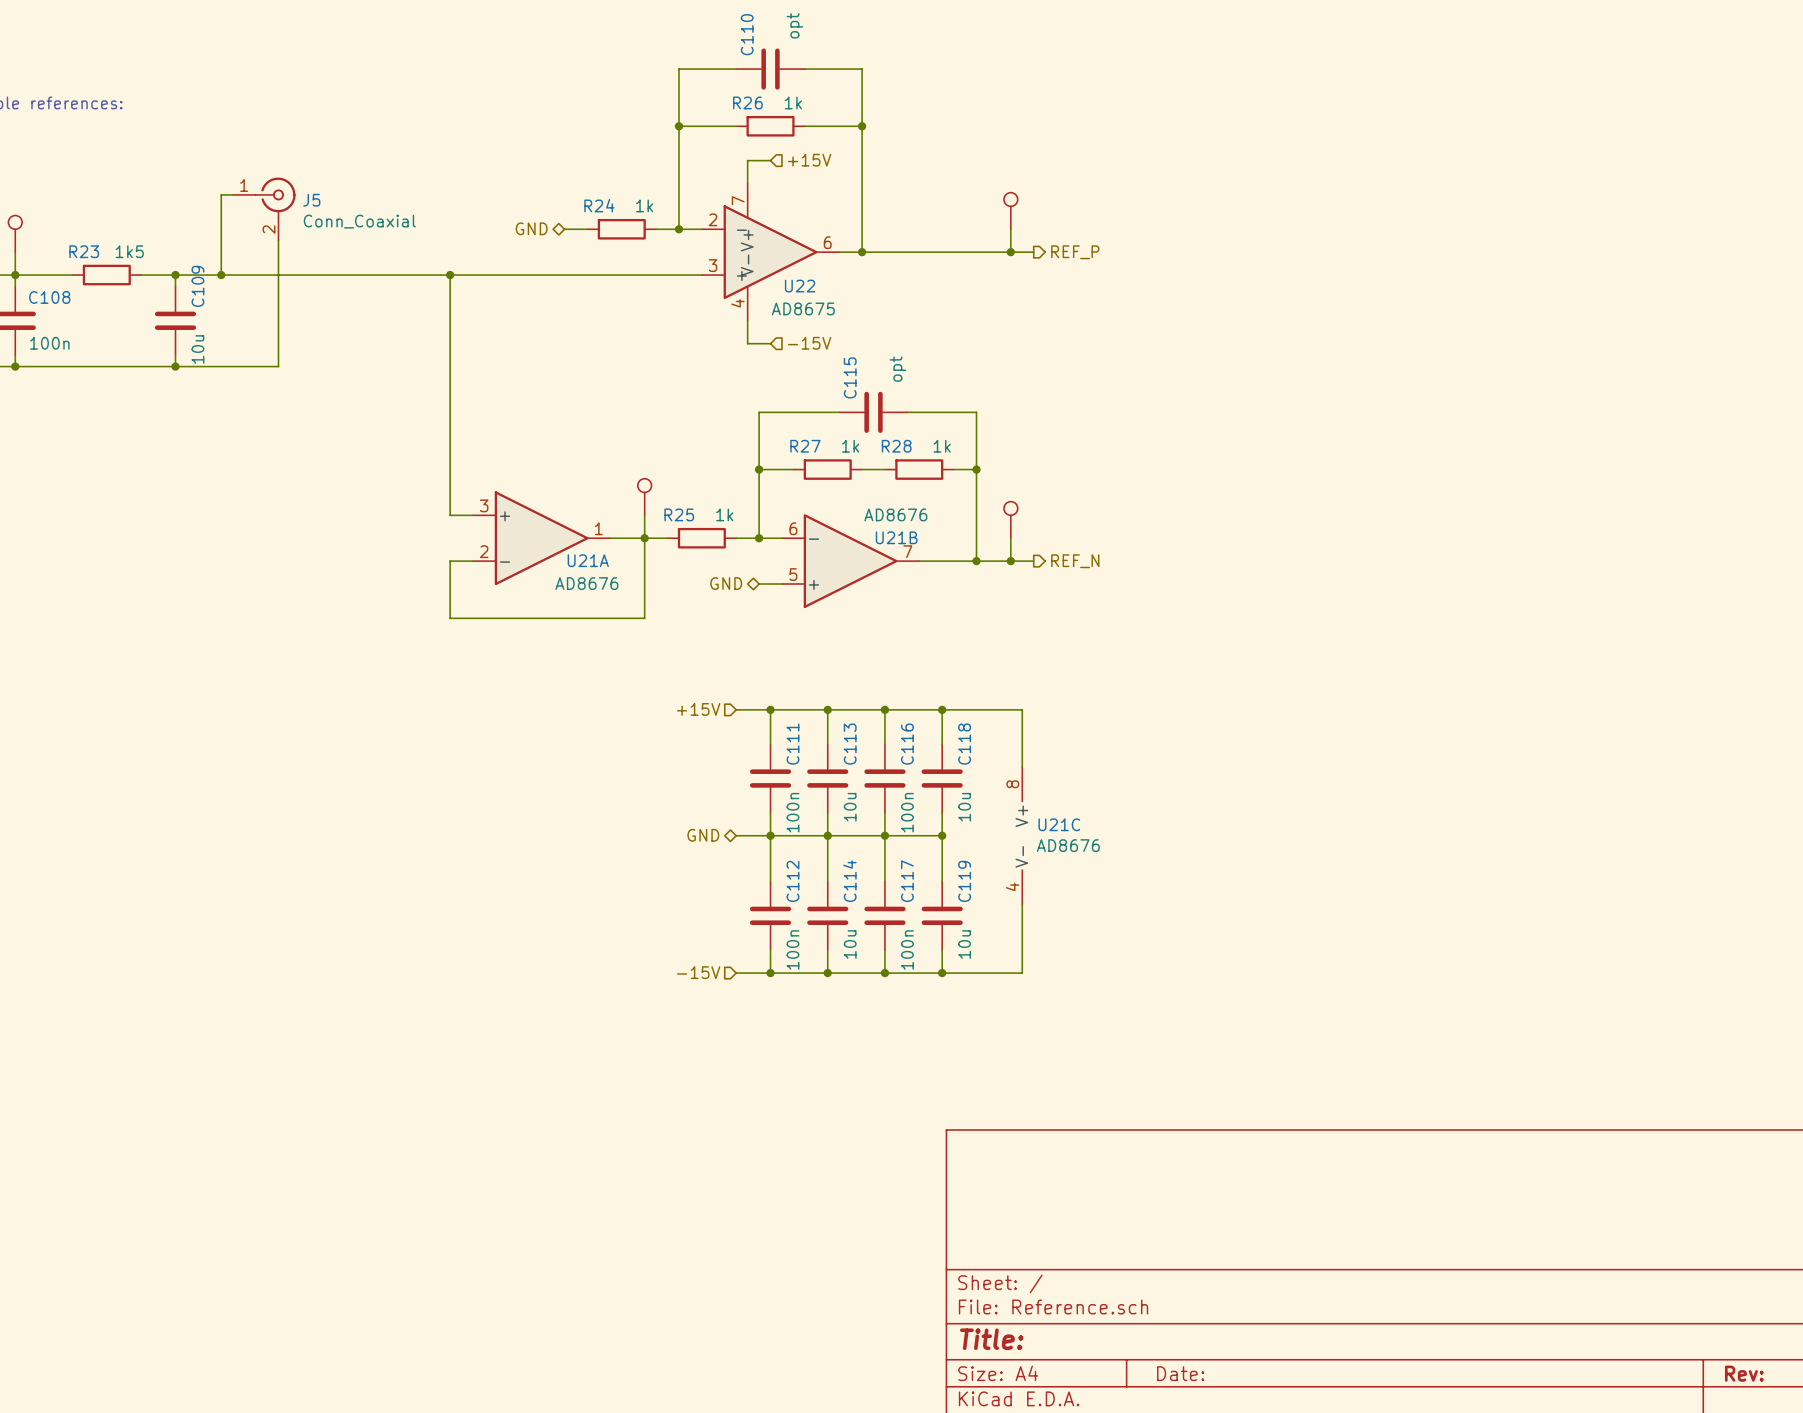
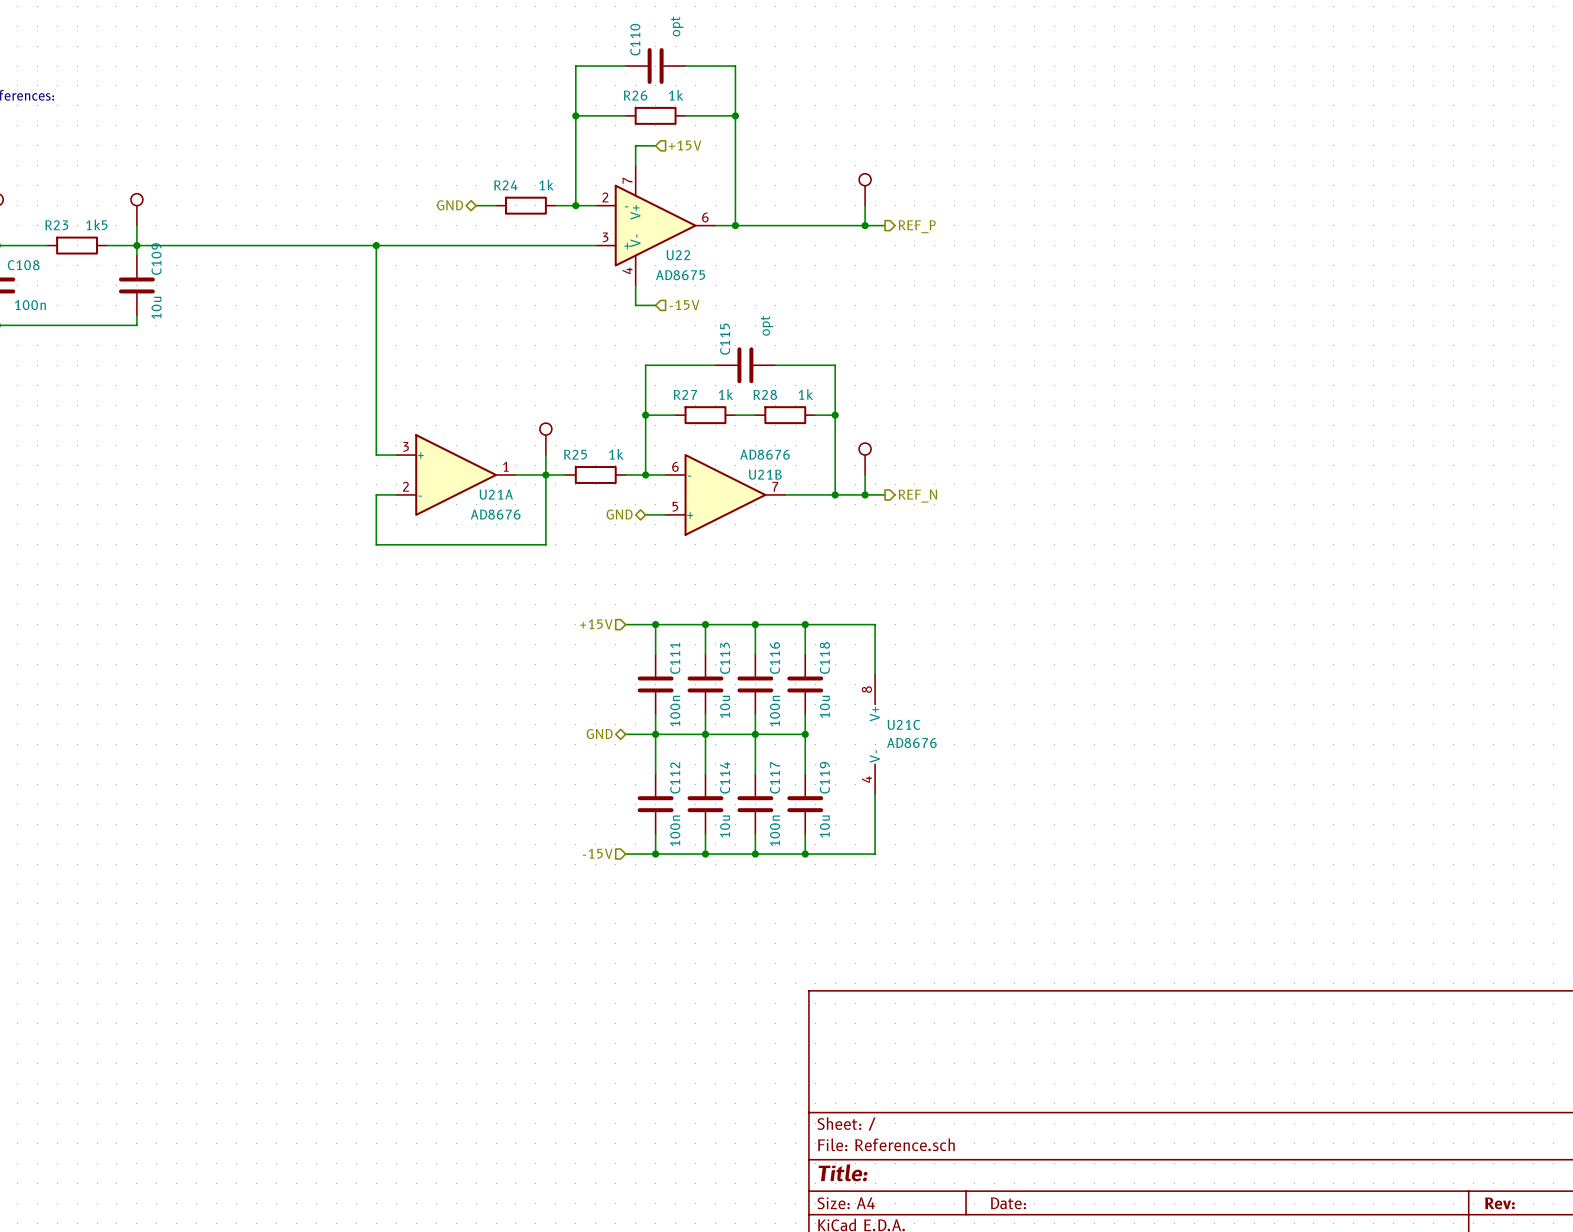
wire: (232, 194) (221, 194) (221, 275) -> none
J5: Conn_Coaxial (264, 209) -> none
part: none -> (136, 209)
wire: (278, 240) (278, 366) (175, 366) -> none
wire: none -> (136, 225) (136, 245)
junction: (221, 275) -> none
junction: (175, 366) -> none

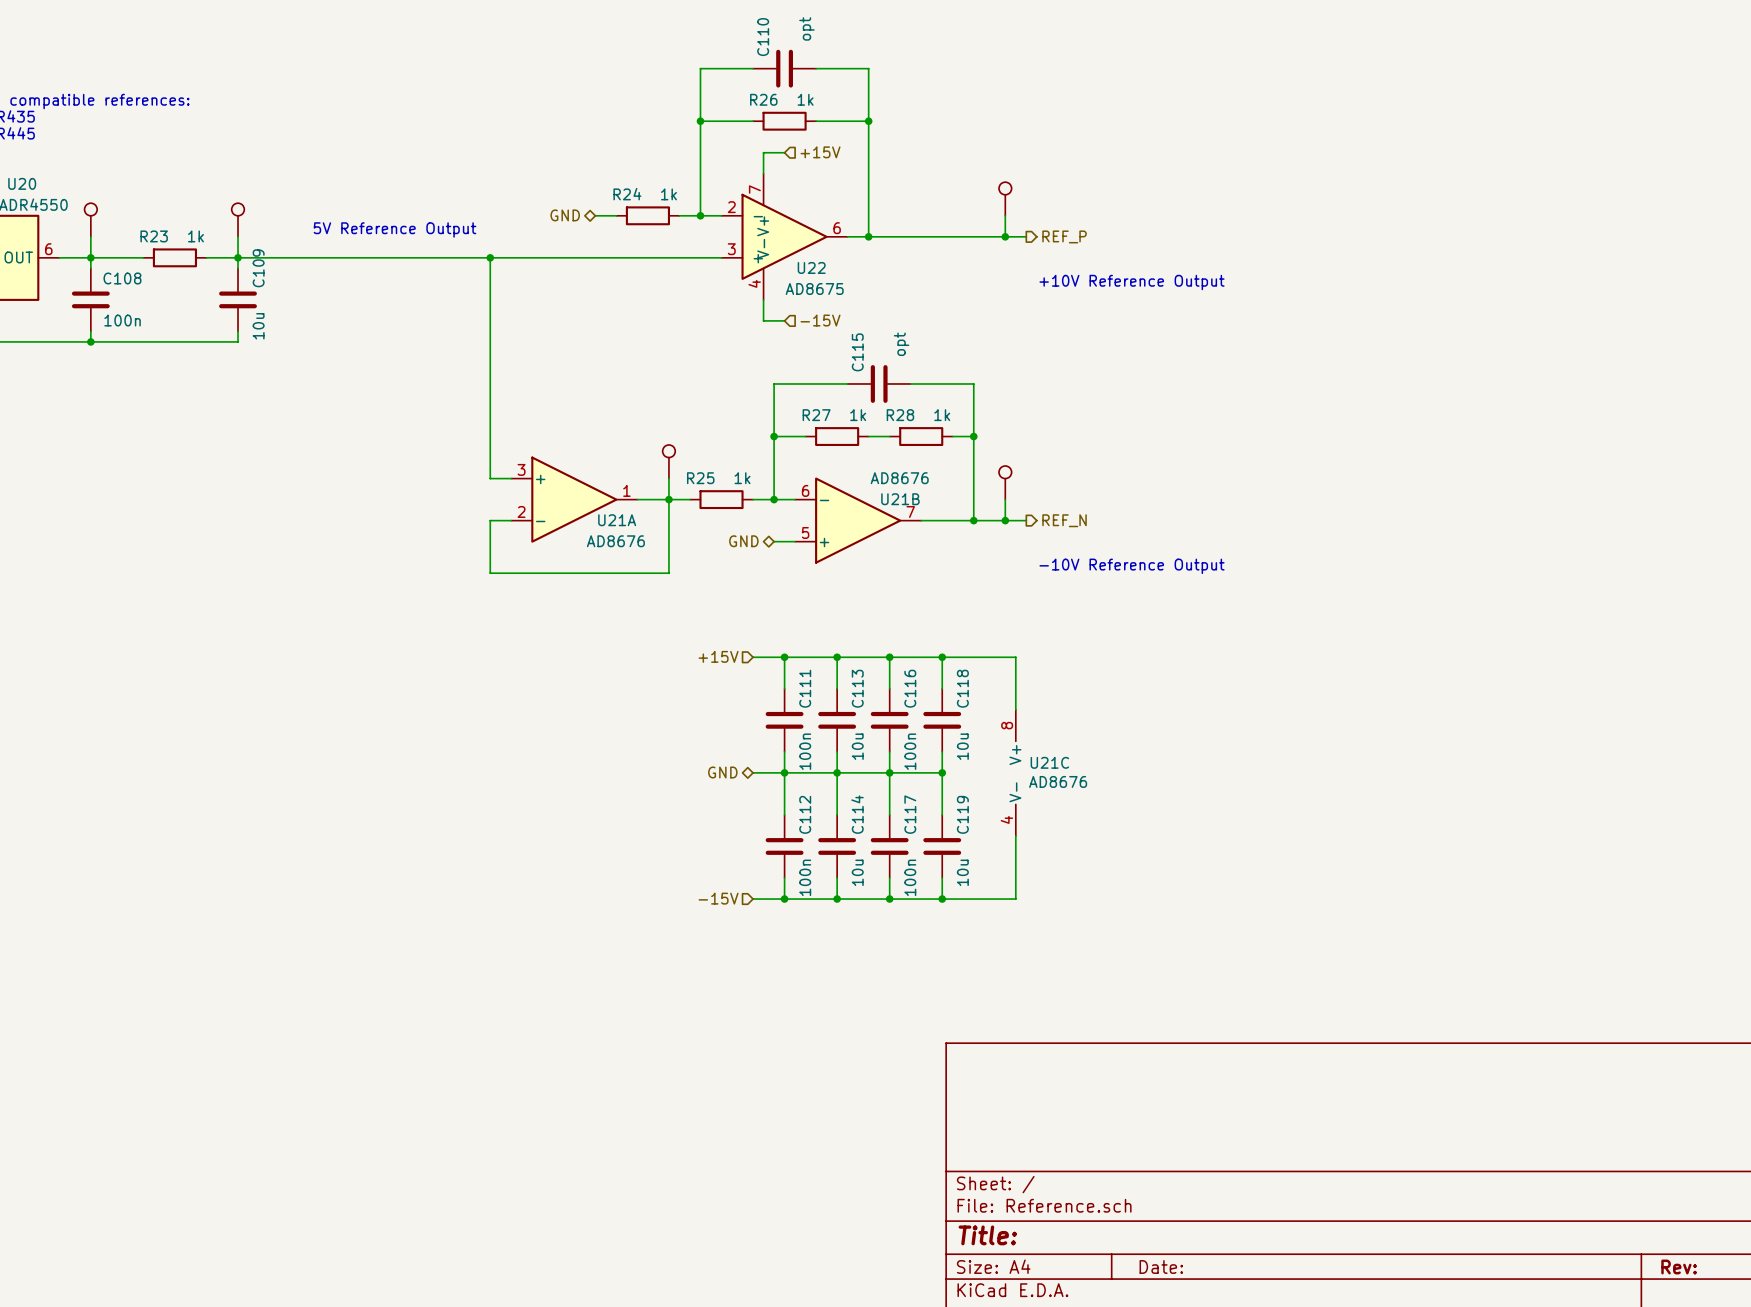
text: none -> 5V Reference Output (395, 229)
R23 value: 1k5 (96, 224) -> 1k (195, 236)
text: none -> +10V Reference Output (1132, 282)
text: none -> -10V Reference Output (1132, 566)

